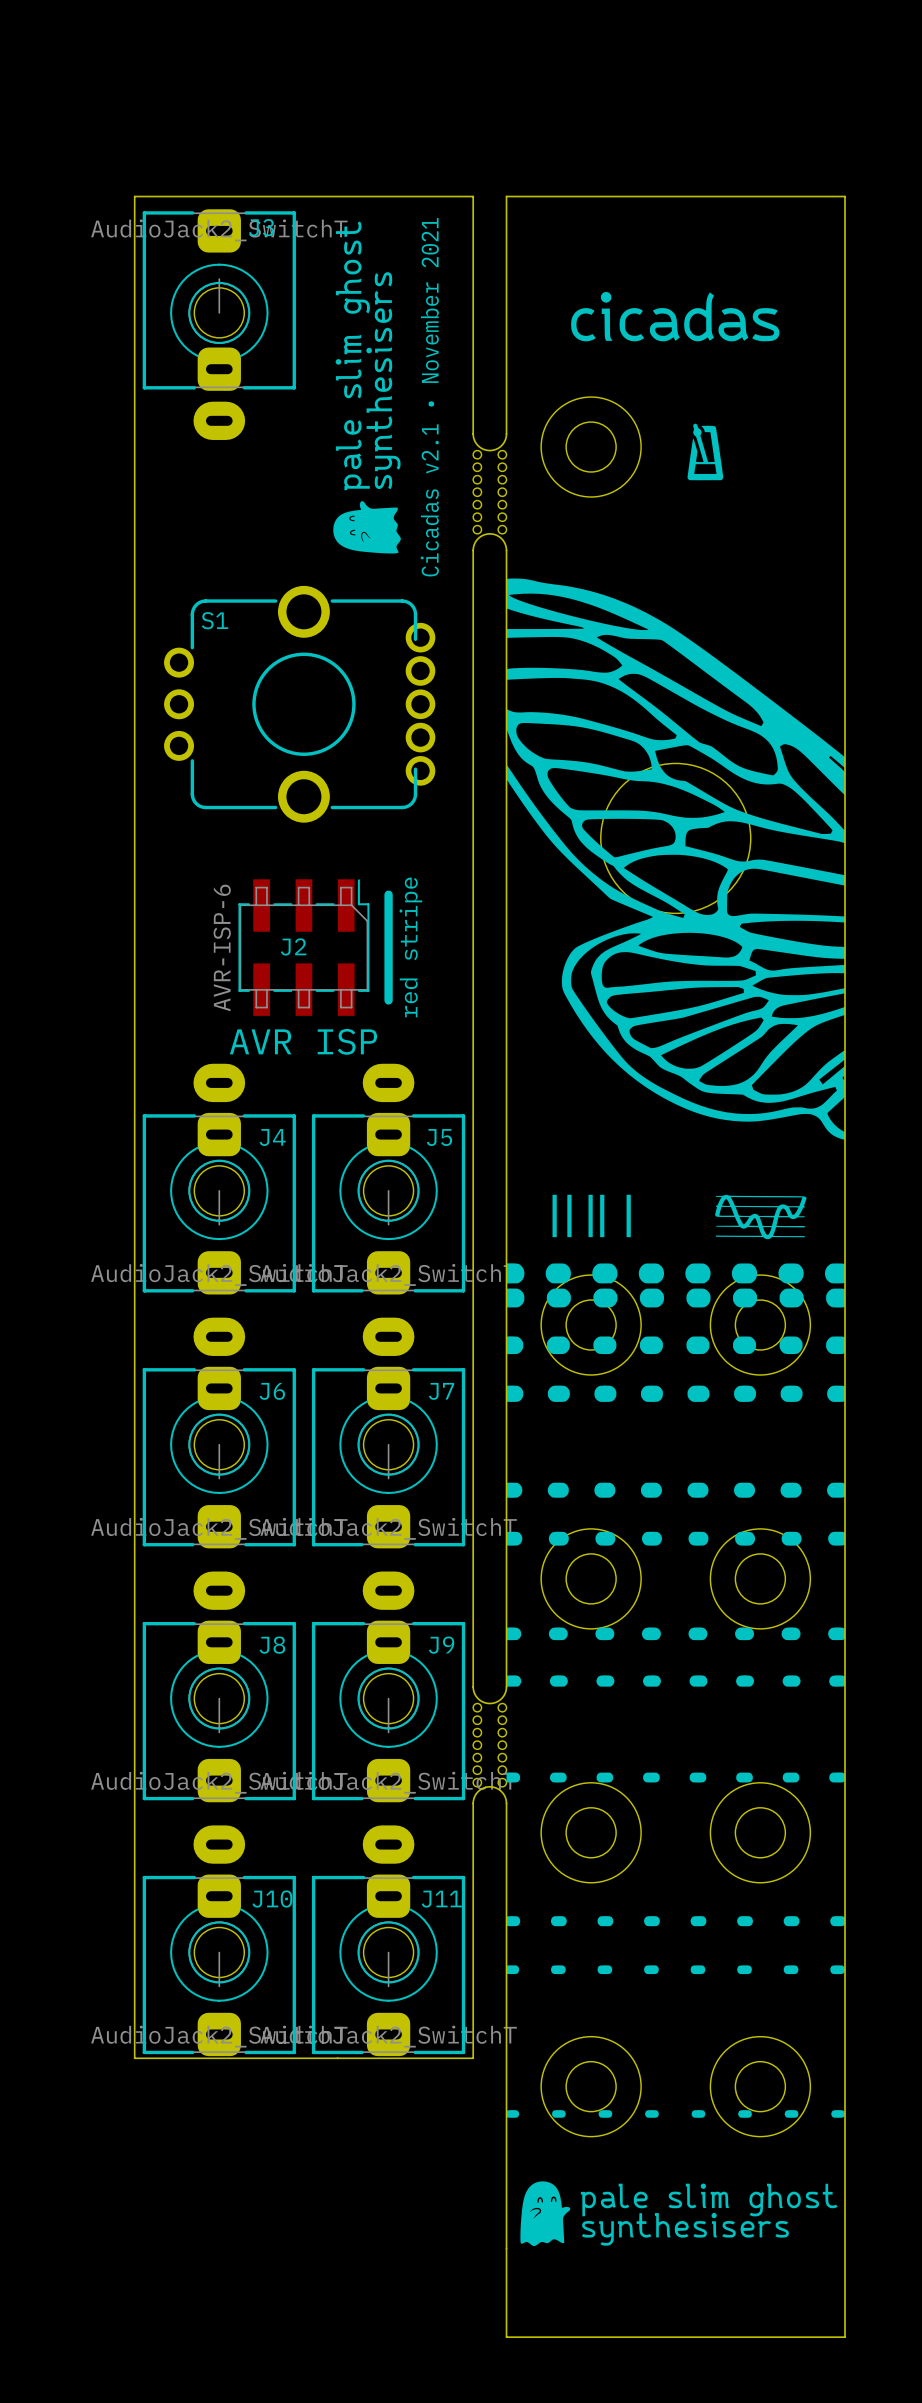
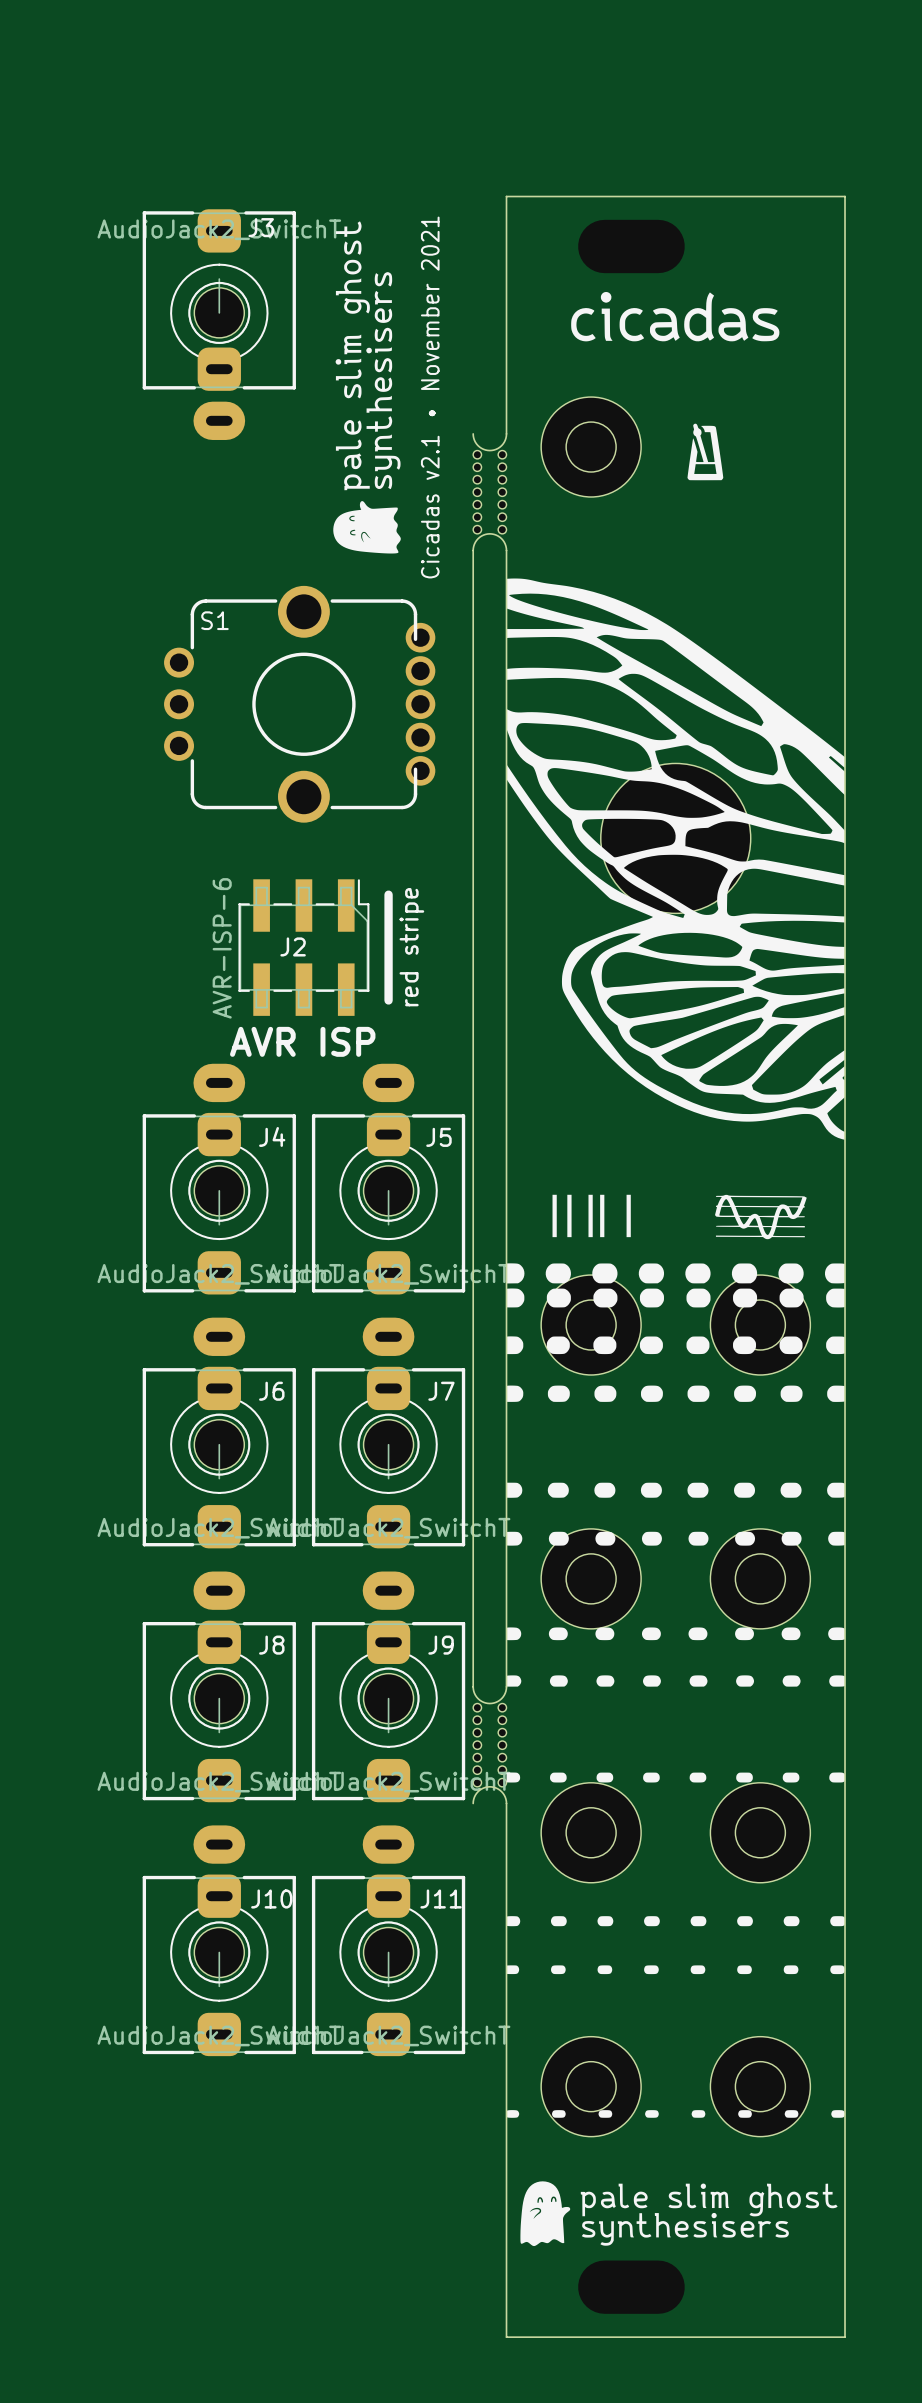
board edge: (473, 433) (473, 196) (134, 196) (134, 2058) (473, 2058) (473, 1803) -> none

